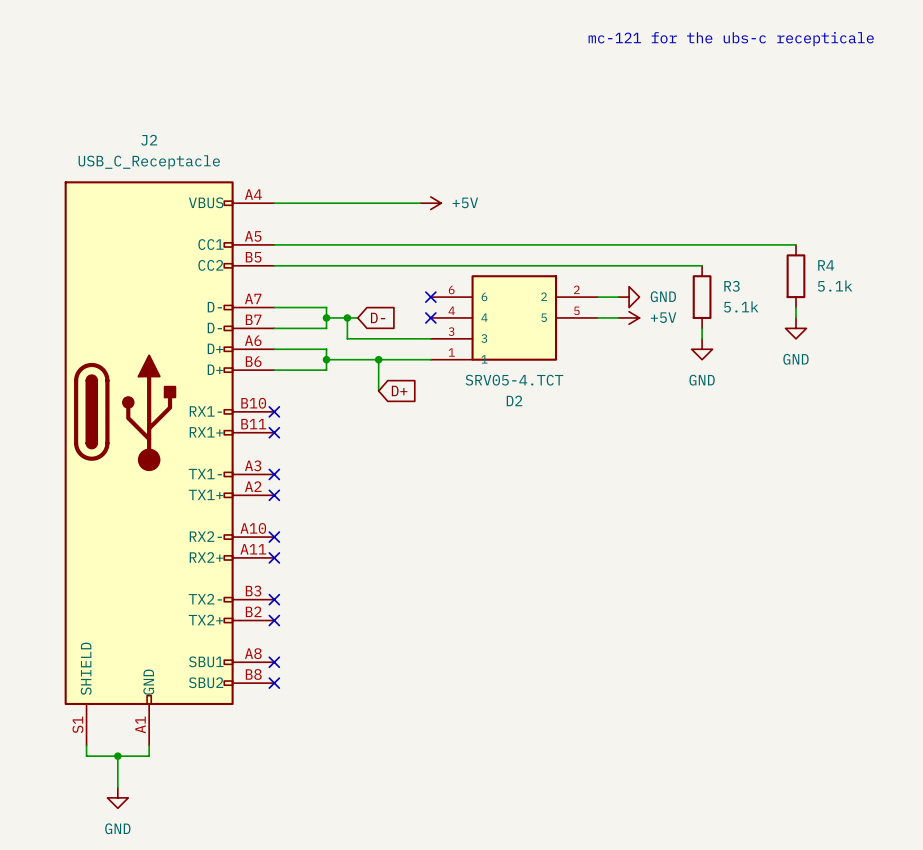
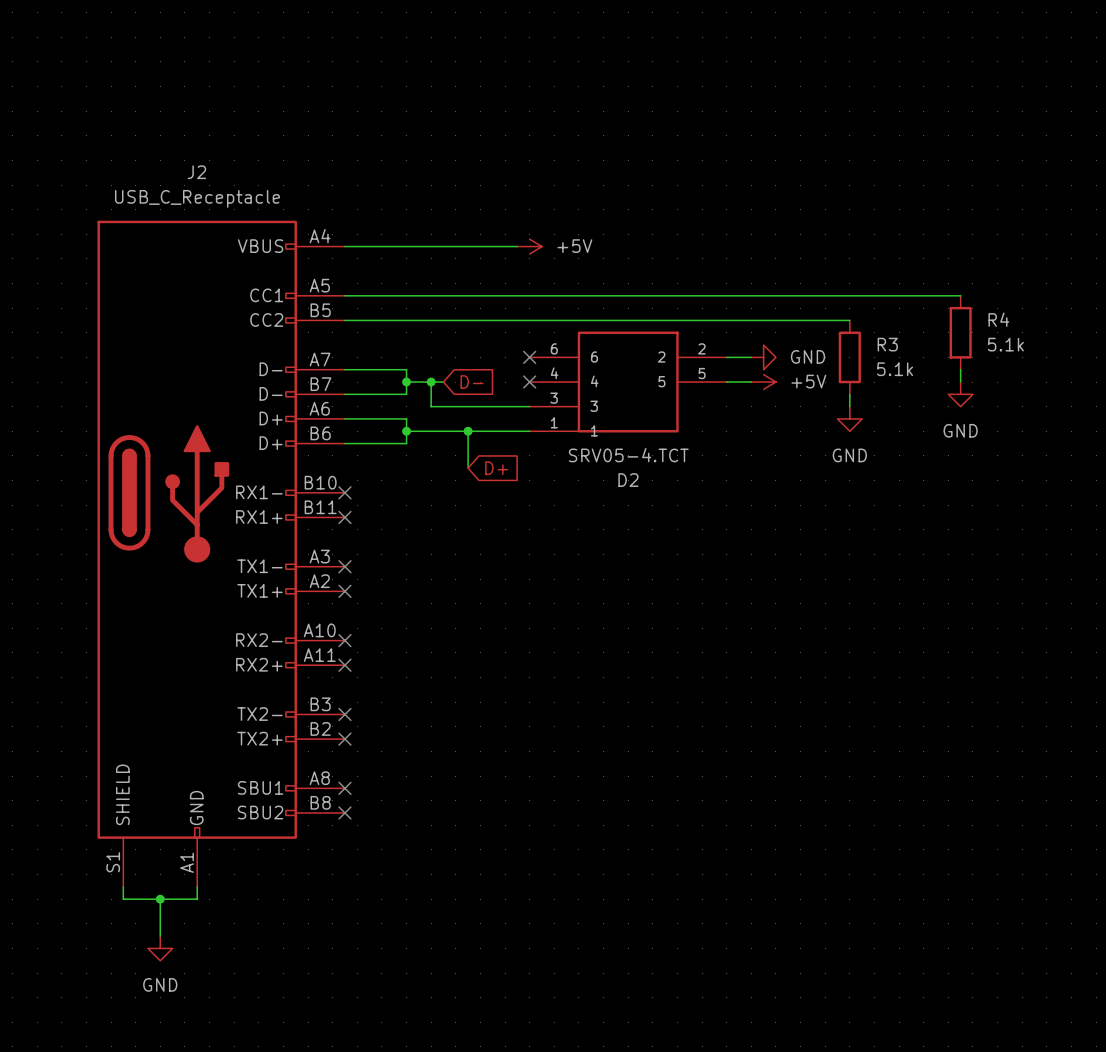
text: mc-121 for the ubs-c recepticale (731, 39) -> none

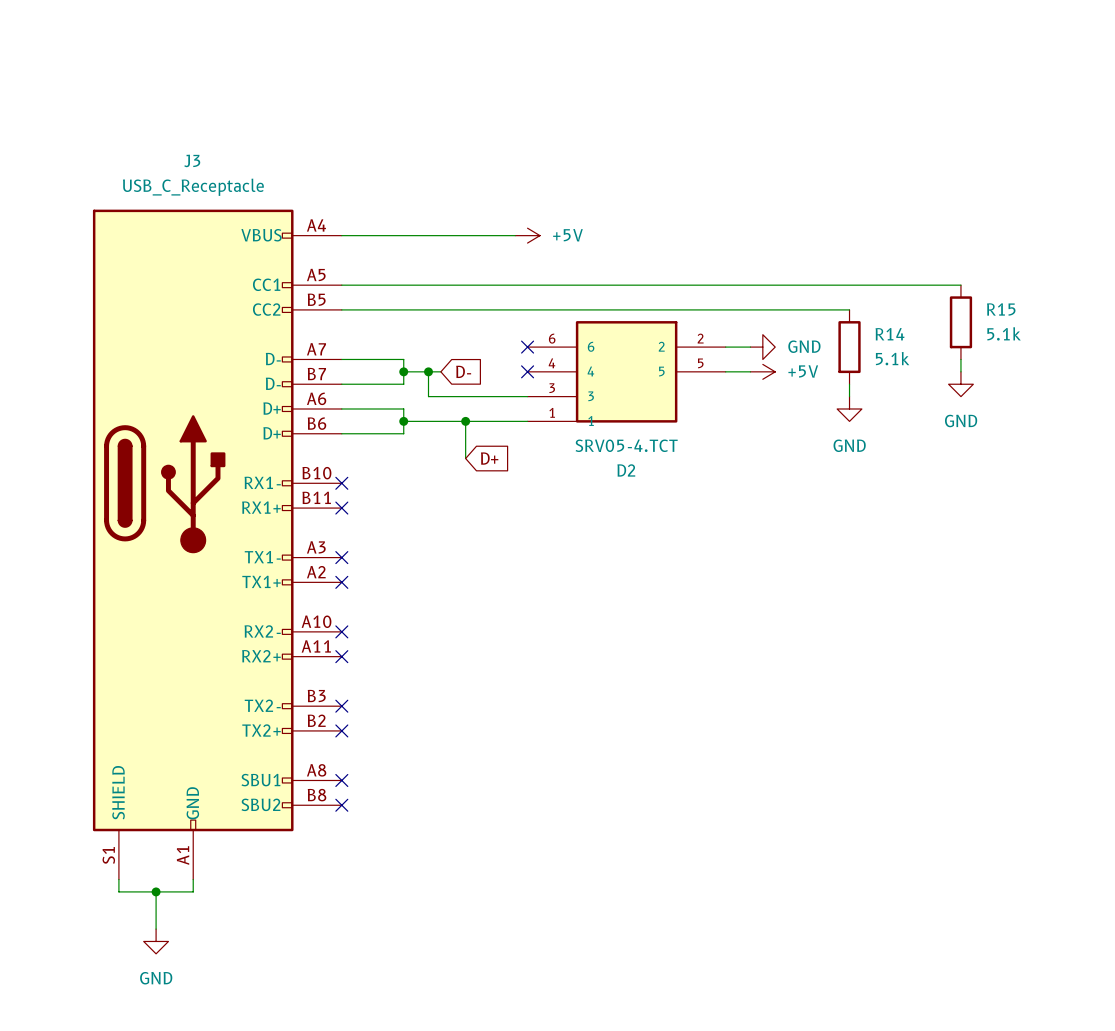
J2 name: J2 (196, 172) -> J3 (192, 160)
R4 name: R4 (998, 319) -> R15 (1001, 309)
R3 name: R3 (887, 344) -> R14 (889, 334)

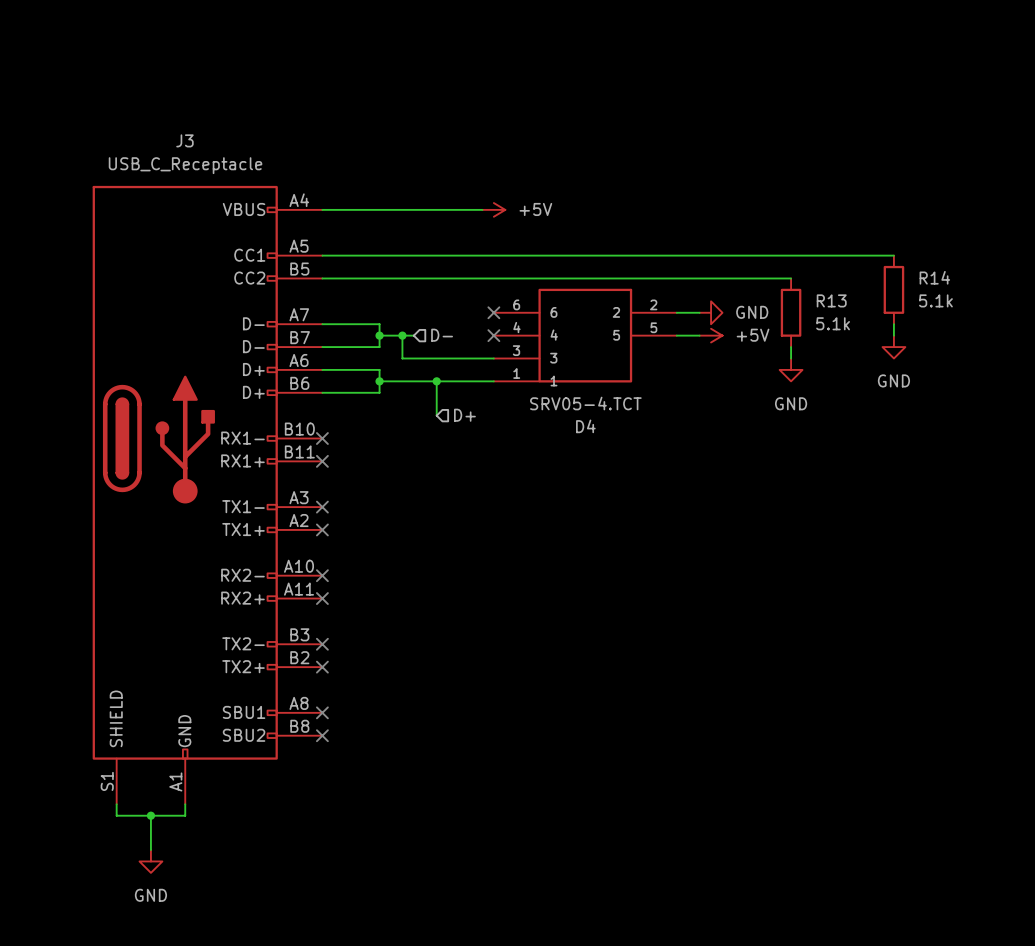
R15 name: R15 (1001, 309) -> R14 (934, 277)
R14 name: R14 (889, 334) -> R13 (831, 300)
global label: D- (463, 371) -> none
hierarchical label: none -> D- (442, 335)
global label: D+ (489, 458) -> none
hierarchical label: none -> D+ (464, 415)
D2 name: D2 (626, 470) -> D4 (585, 426)

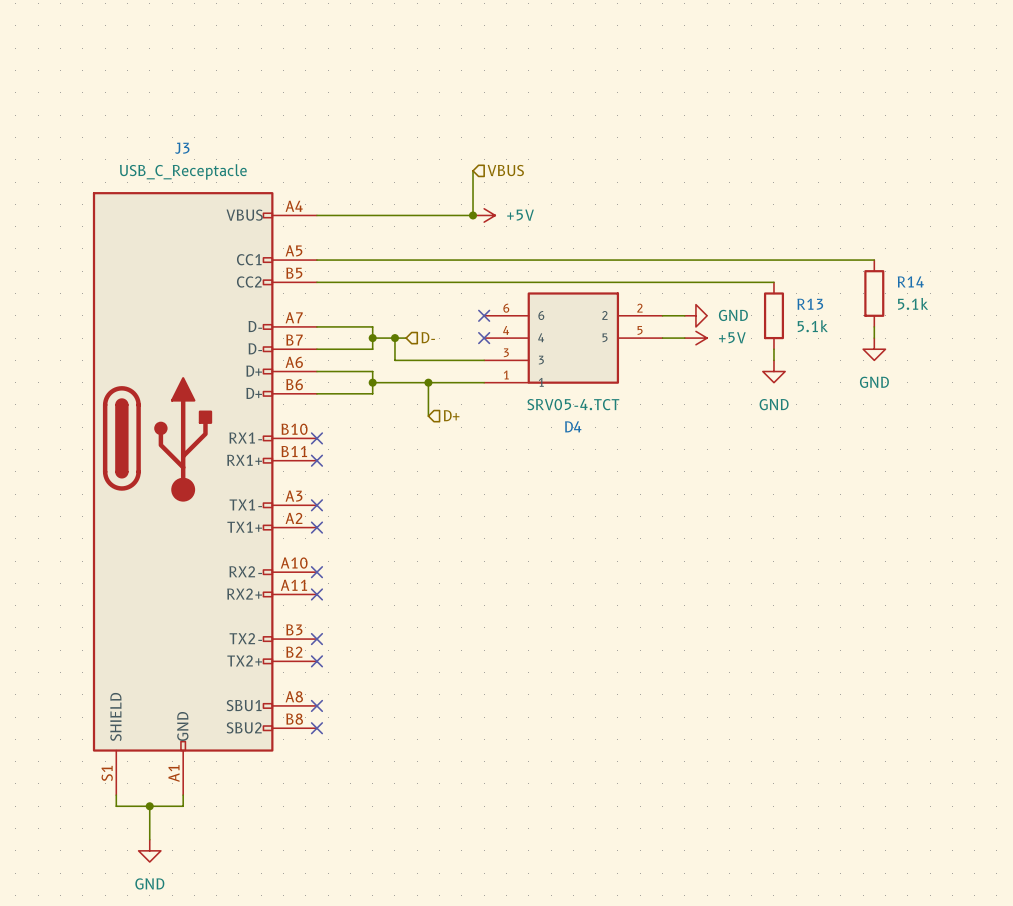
hierarchical label: none -> VBUS (505, 170)
wire: none -> (473, 170) (473, 215)
junction: none -> (473, 215)

